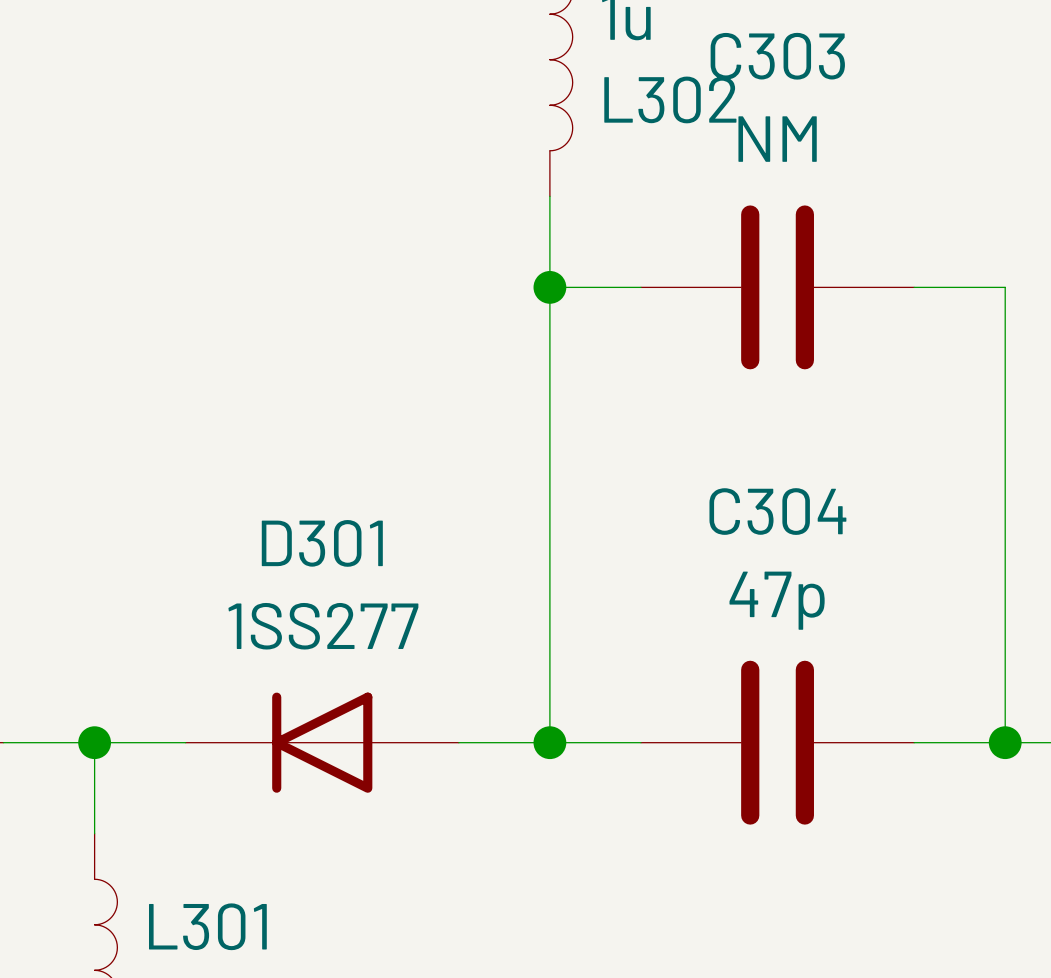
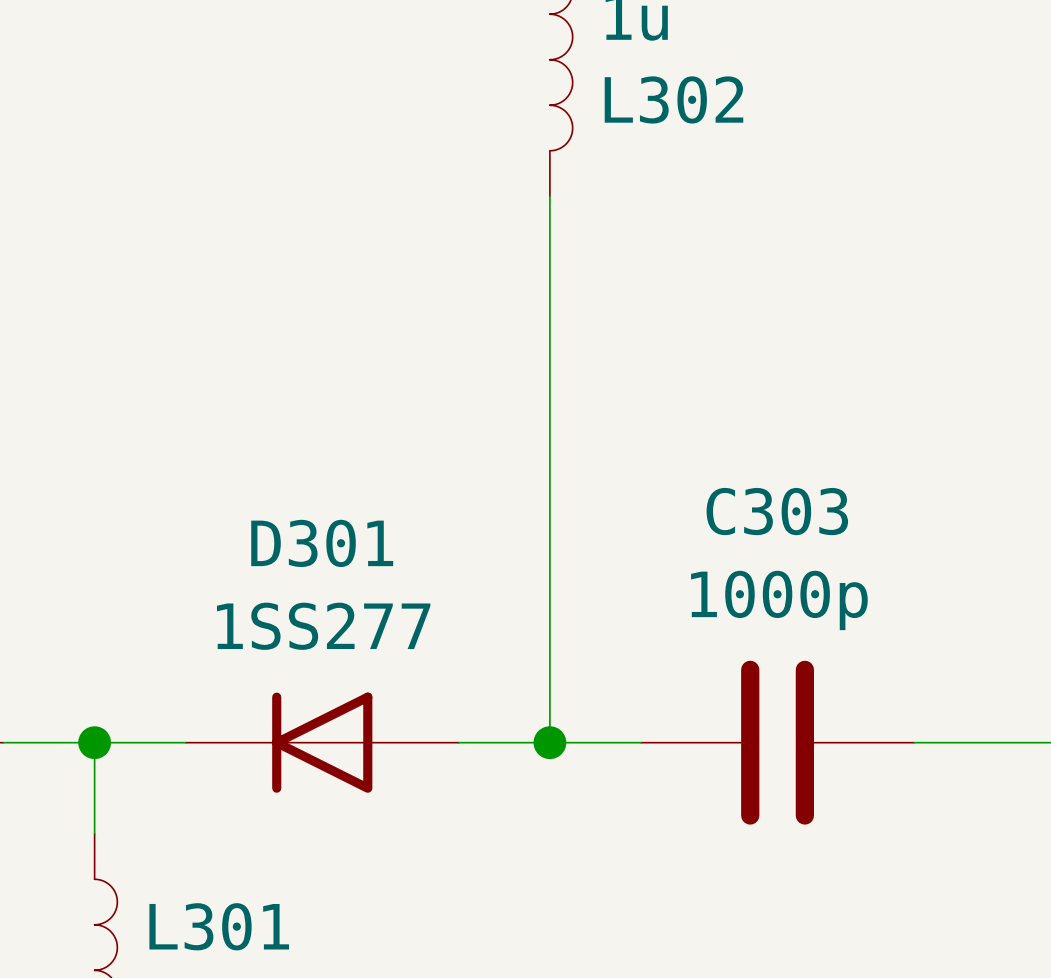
wire: (549, 287) (640, 287) -> none
junction: (549, 287) -> none
C303: NM (777, 287) -> none
wire: (914, 287) (1005, 287) (1005, 742) -> none
C304 name: C304 (777, 511) -> C303 (777, 511)
C304 value: 47p (777, 600) -> 1000p (779, 600)
junction: (1005, 742) -> none

